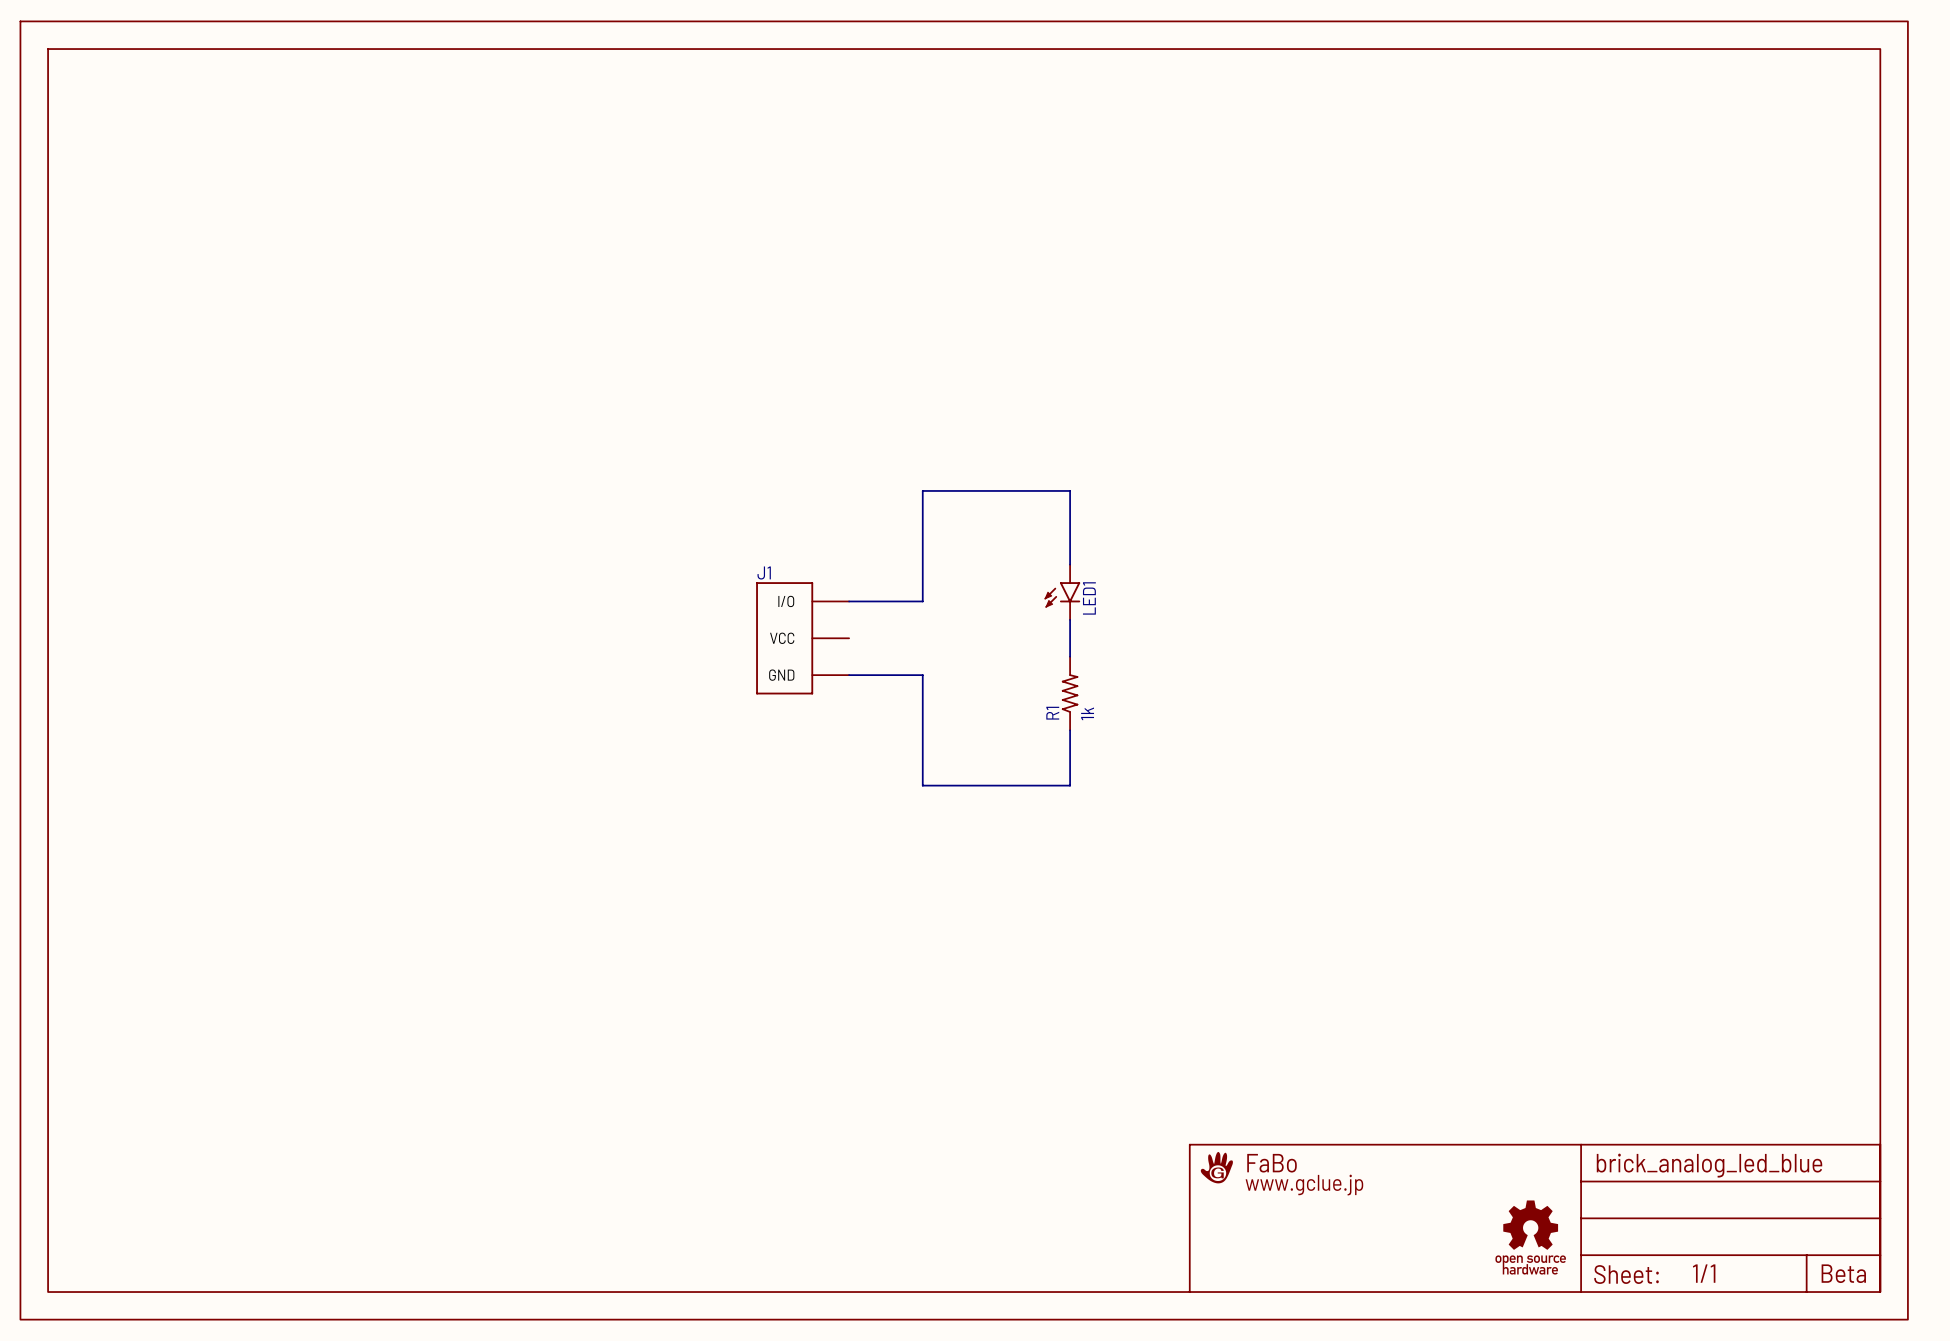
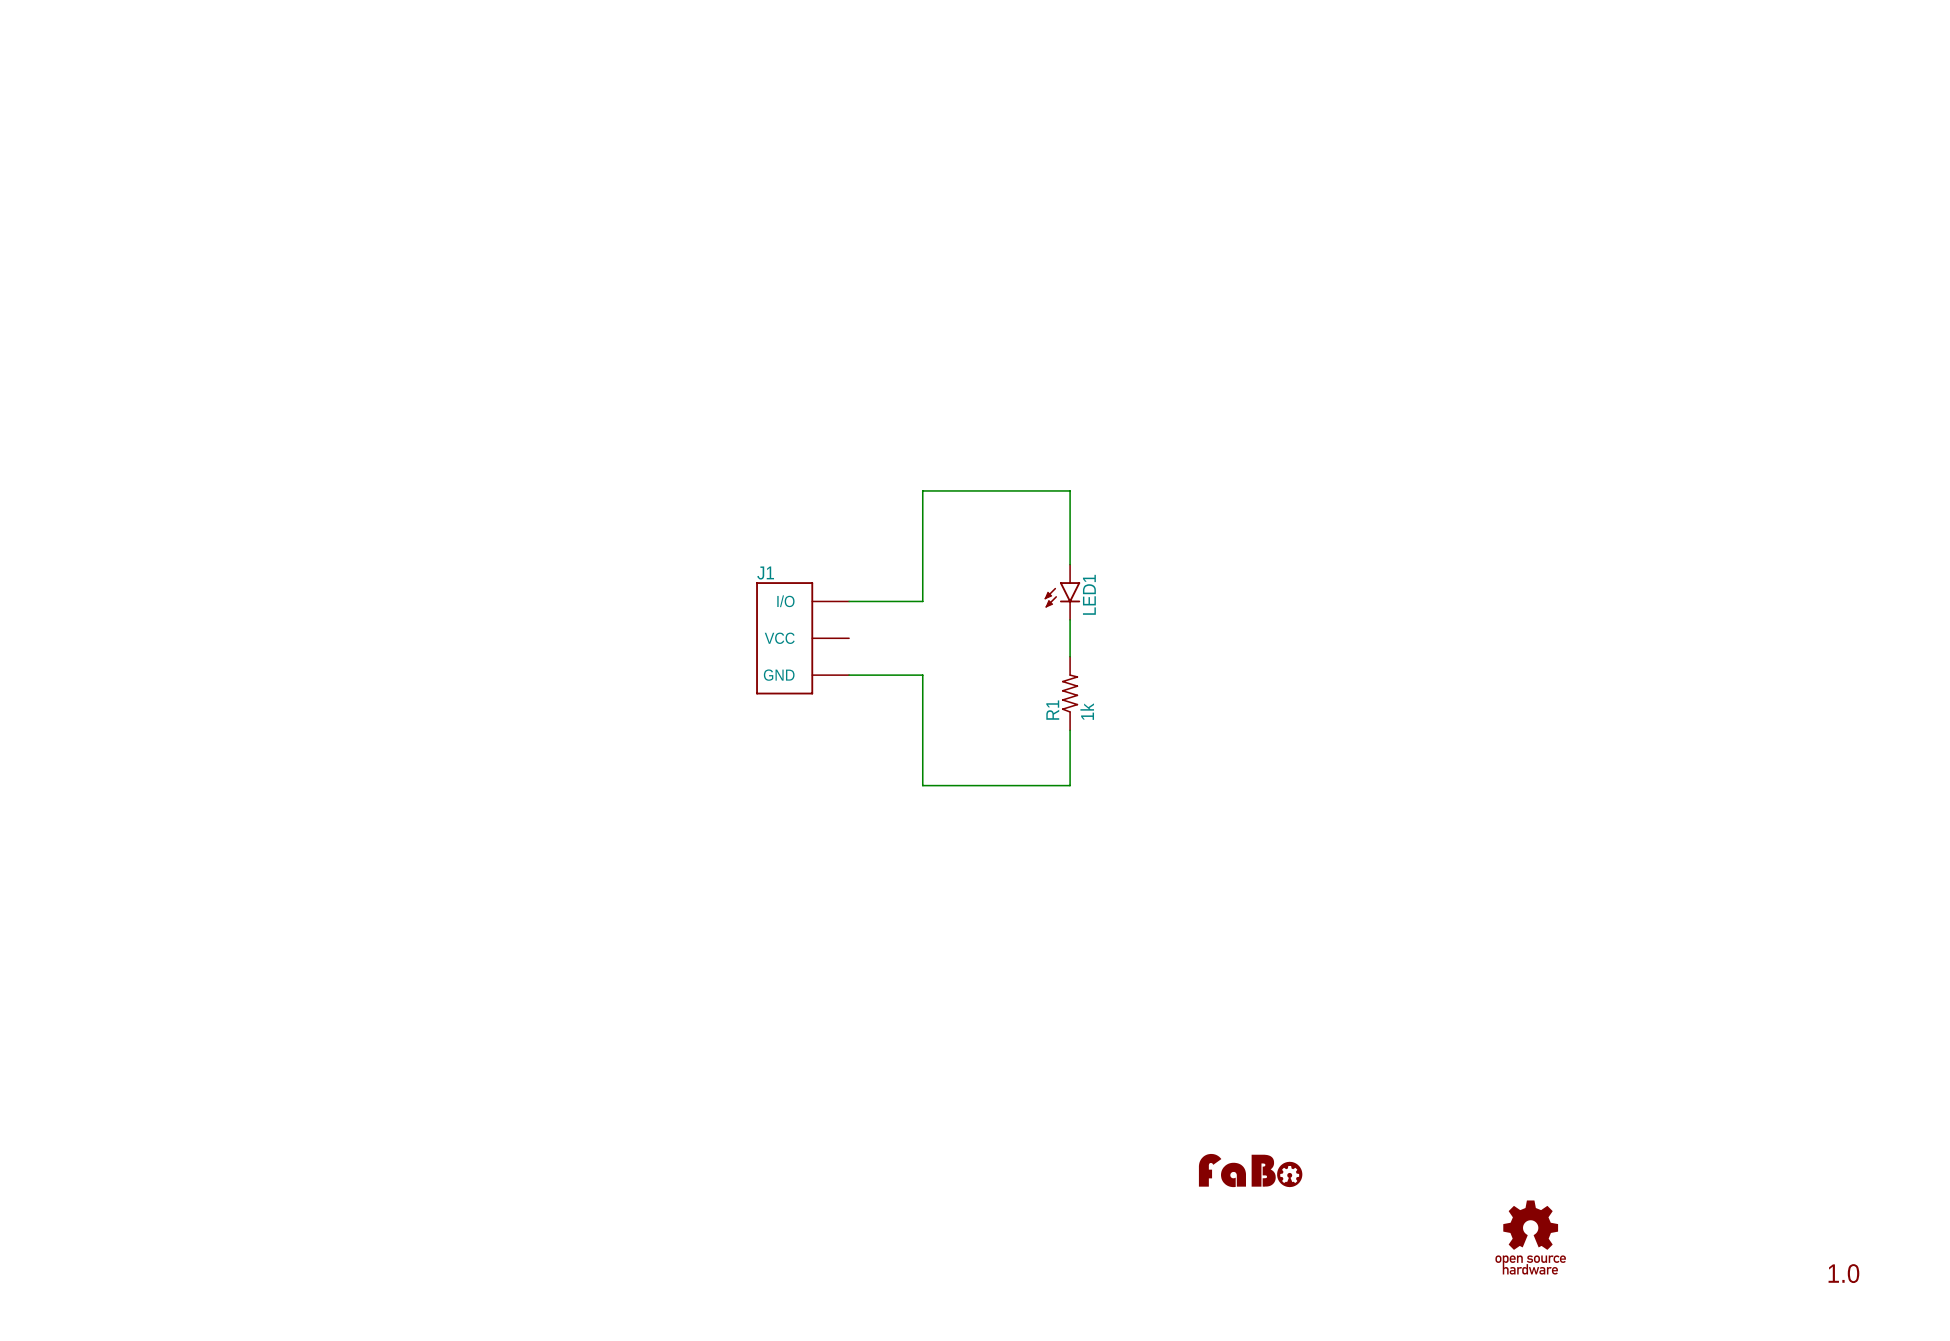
part: (964, 670) -> none
part: none -> (1250, 1170)
text: Beta (1843, 1273) -> 1.0 (1843, 1273)

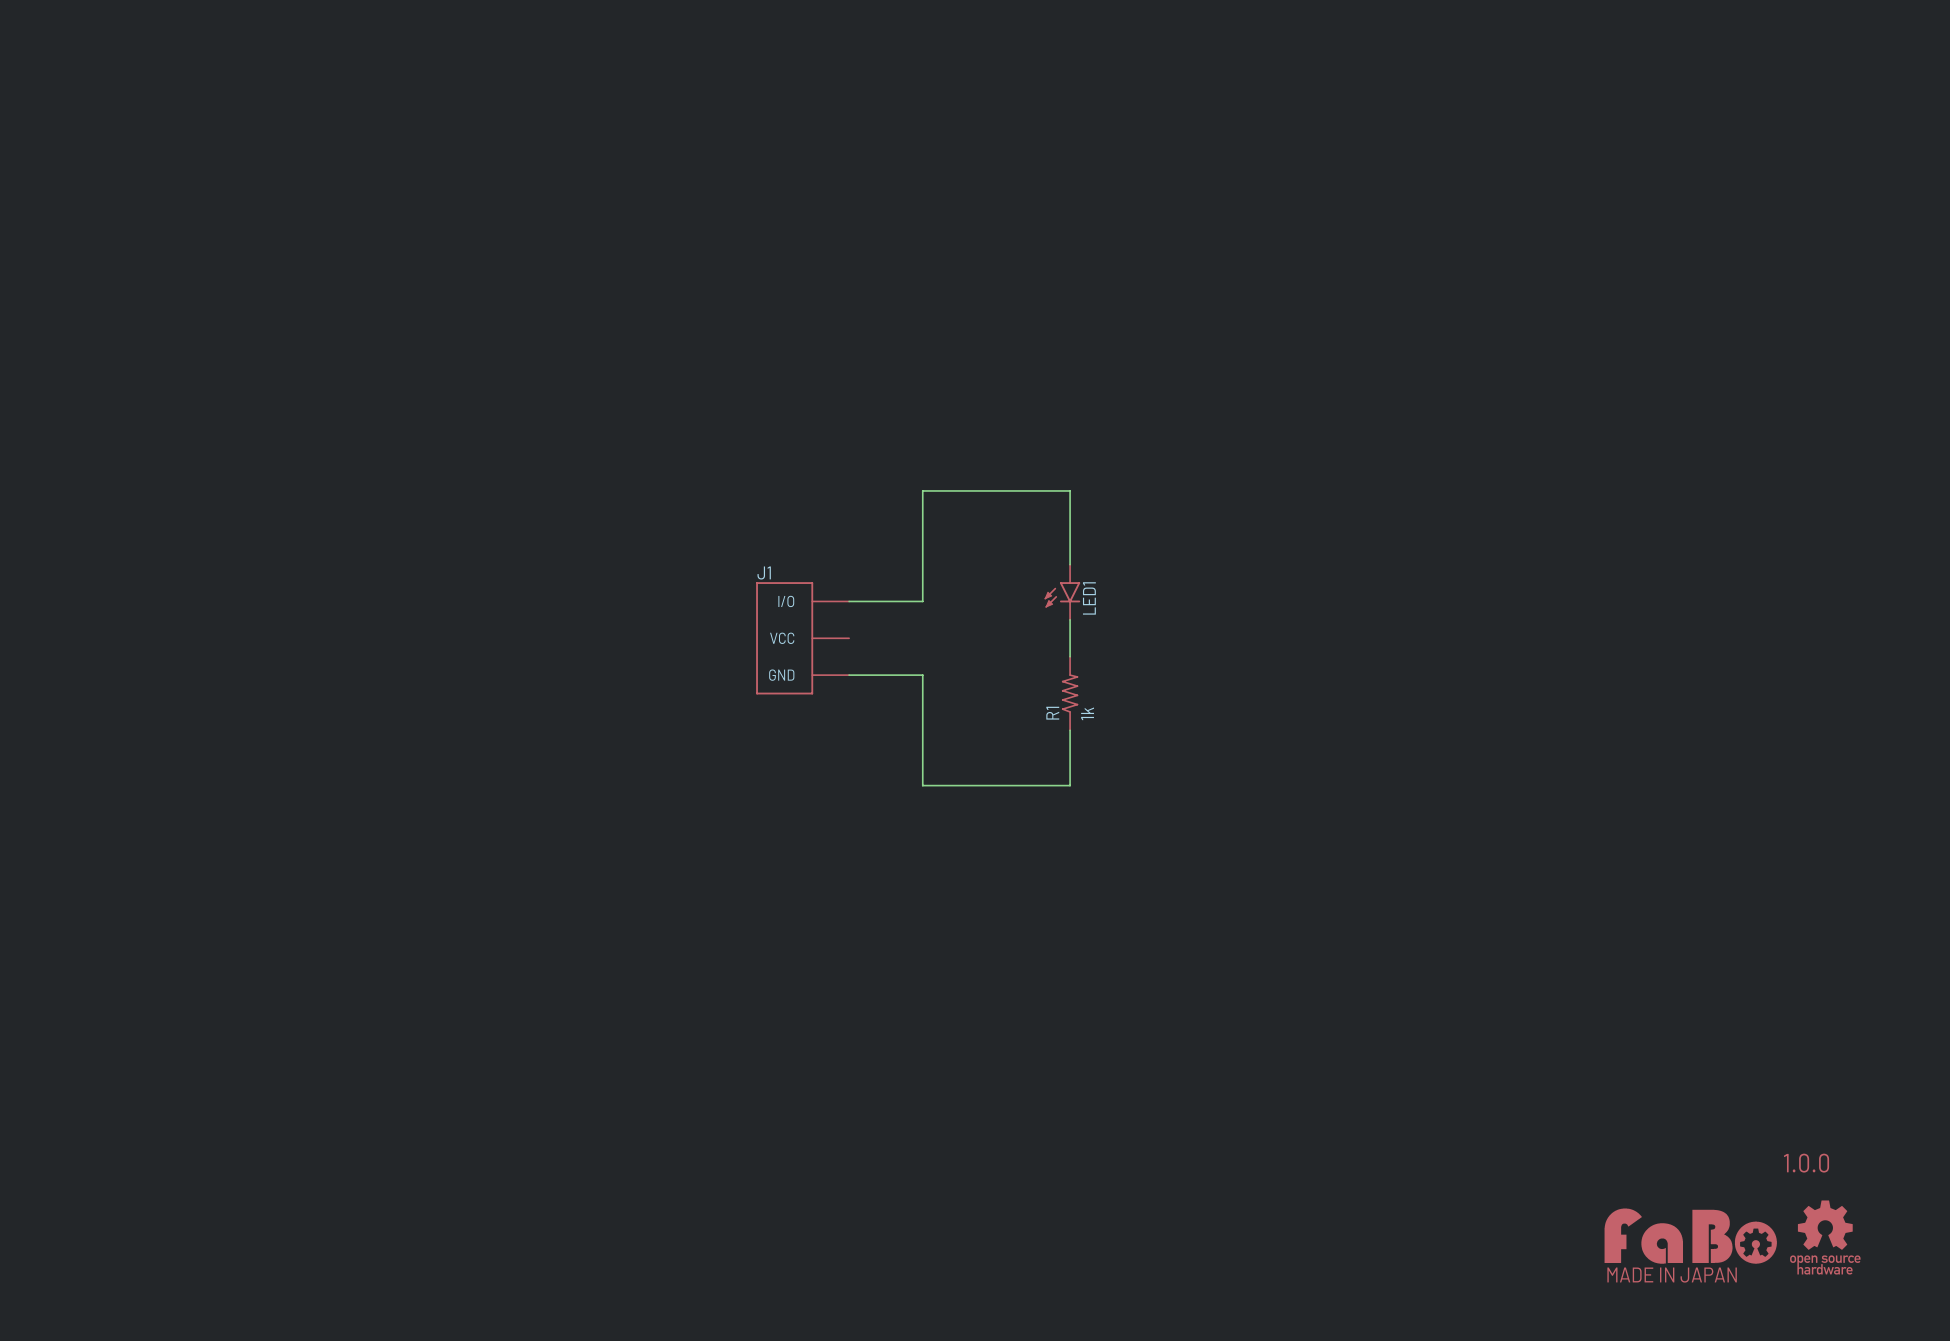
text: none -> 1.0.0 (1806, 1163)
part: (1250, 1170) -> none
part: none -> (1690, 1236)
part: (1530, 1237) -> none
part: none -> (1825, 1237)
text: 1.0 (1843, 1273) -> none

